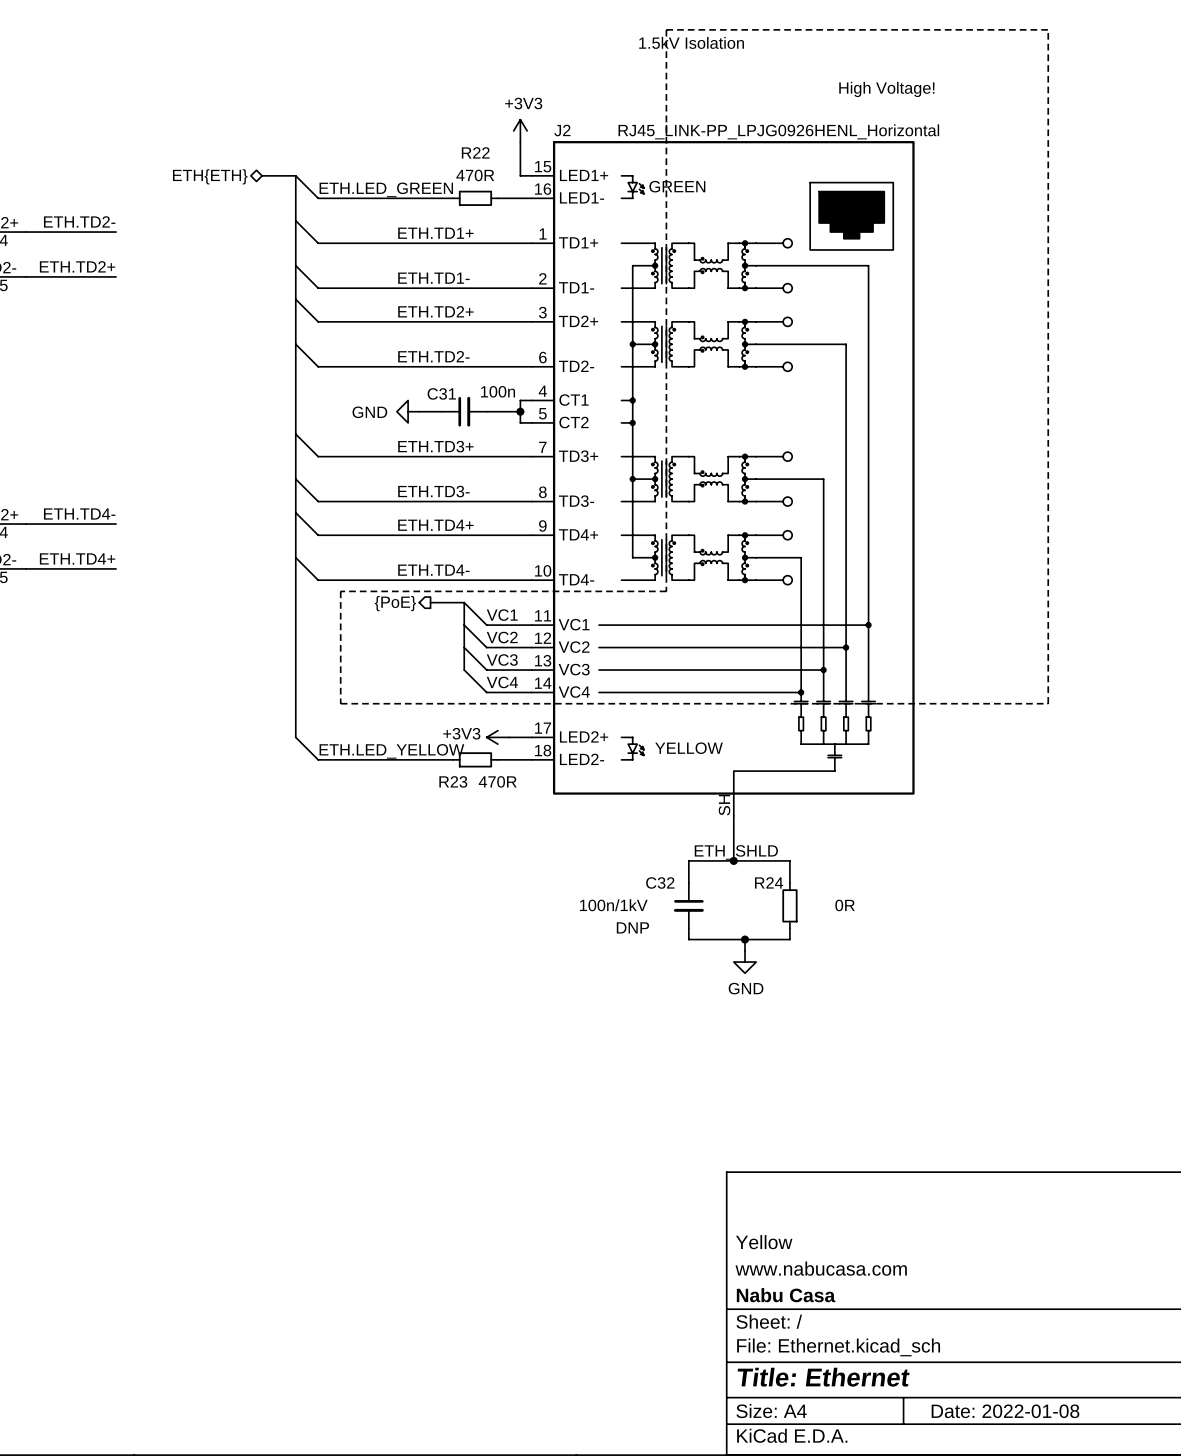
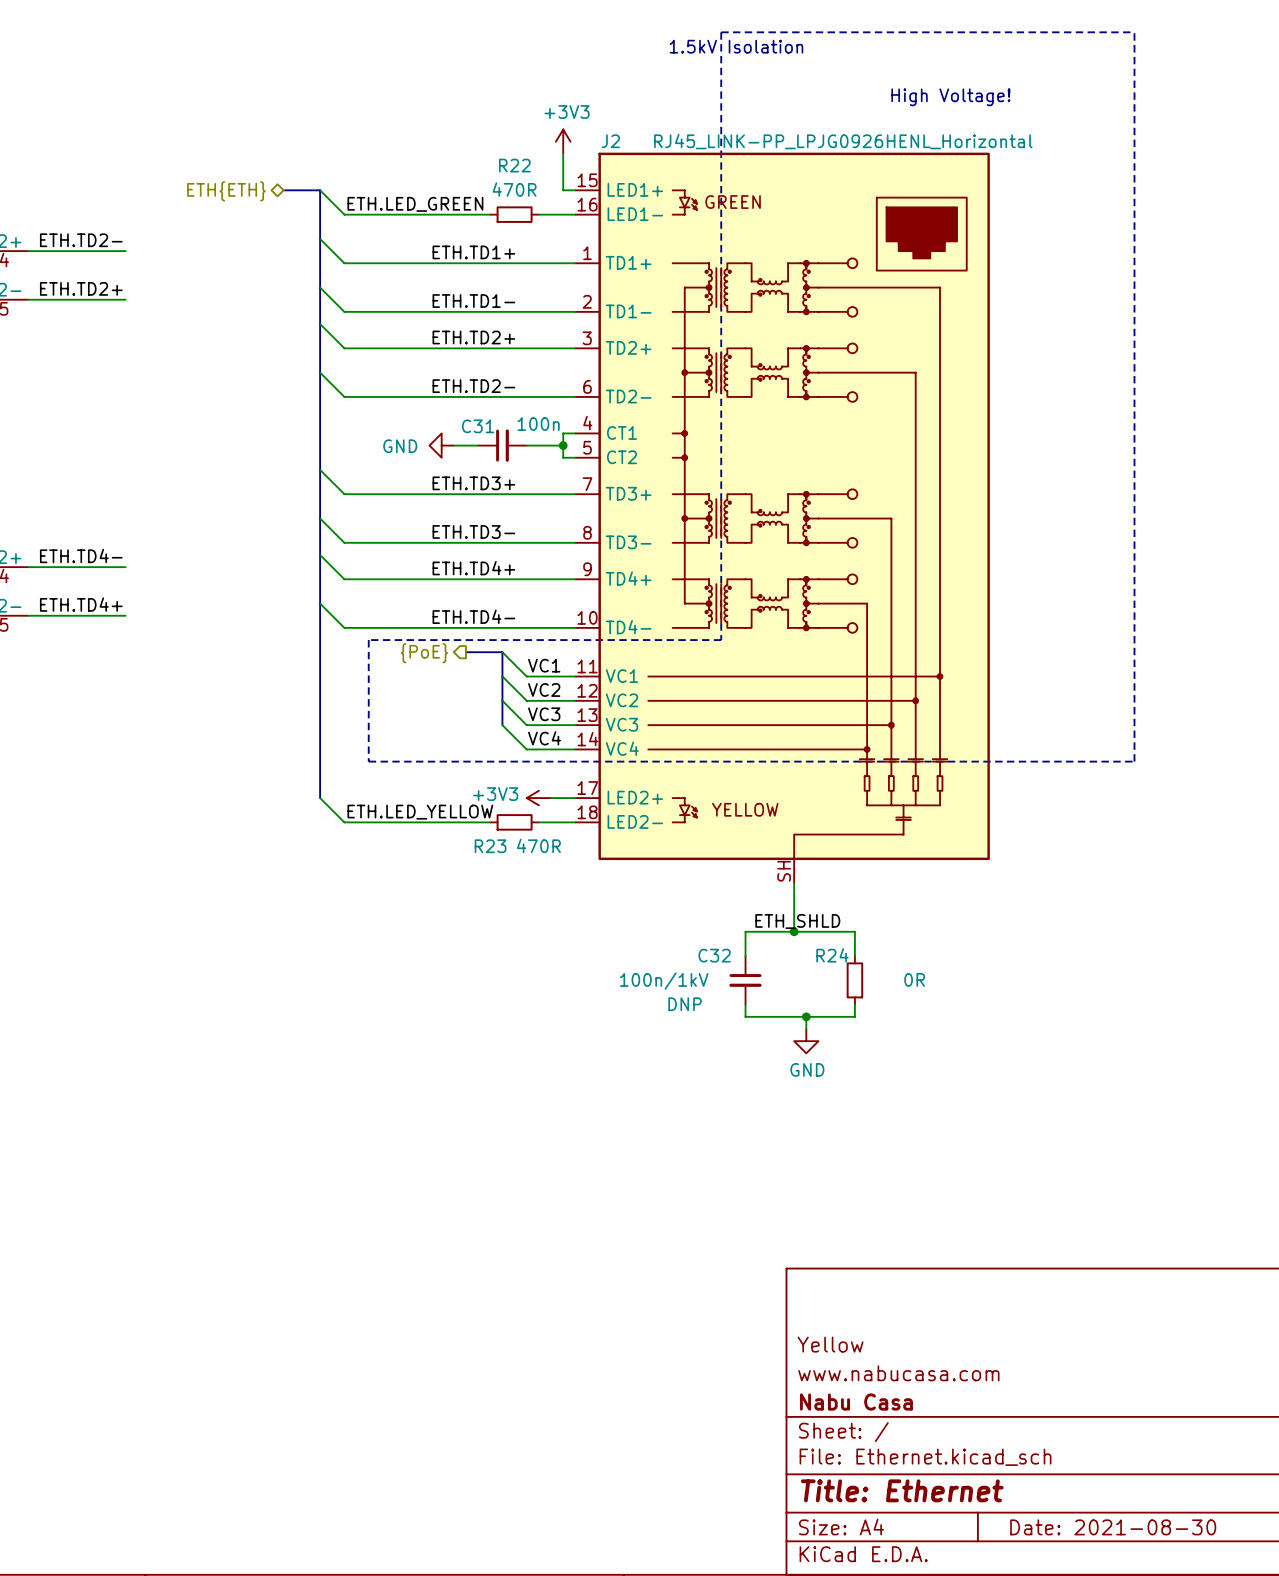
title block: Date: 2022-01-08 (1005, 1411) -> Date: 2021-08-30 (1113, 1527)

